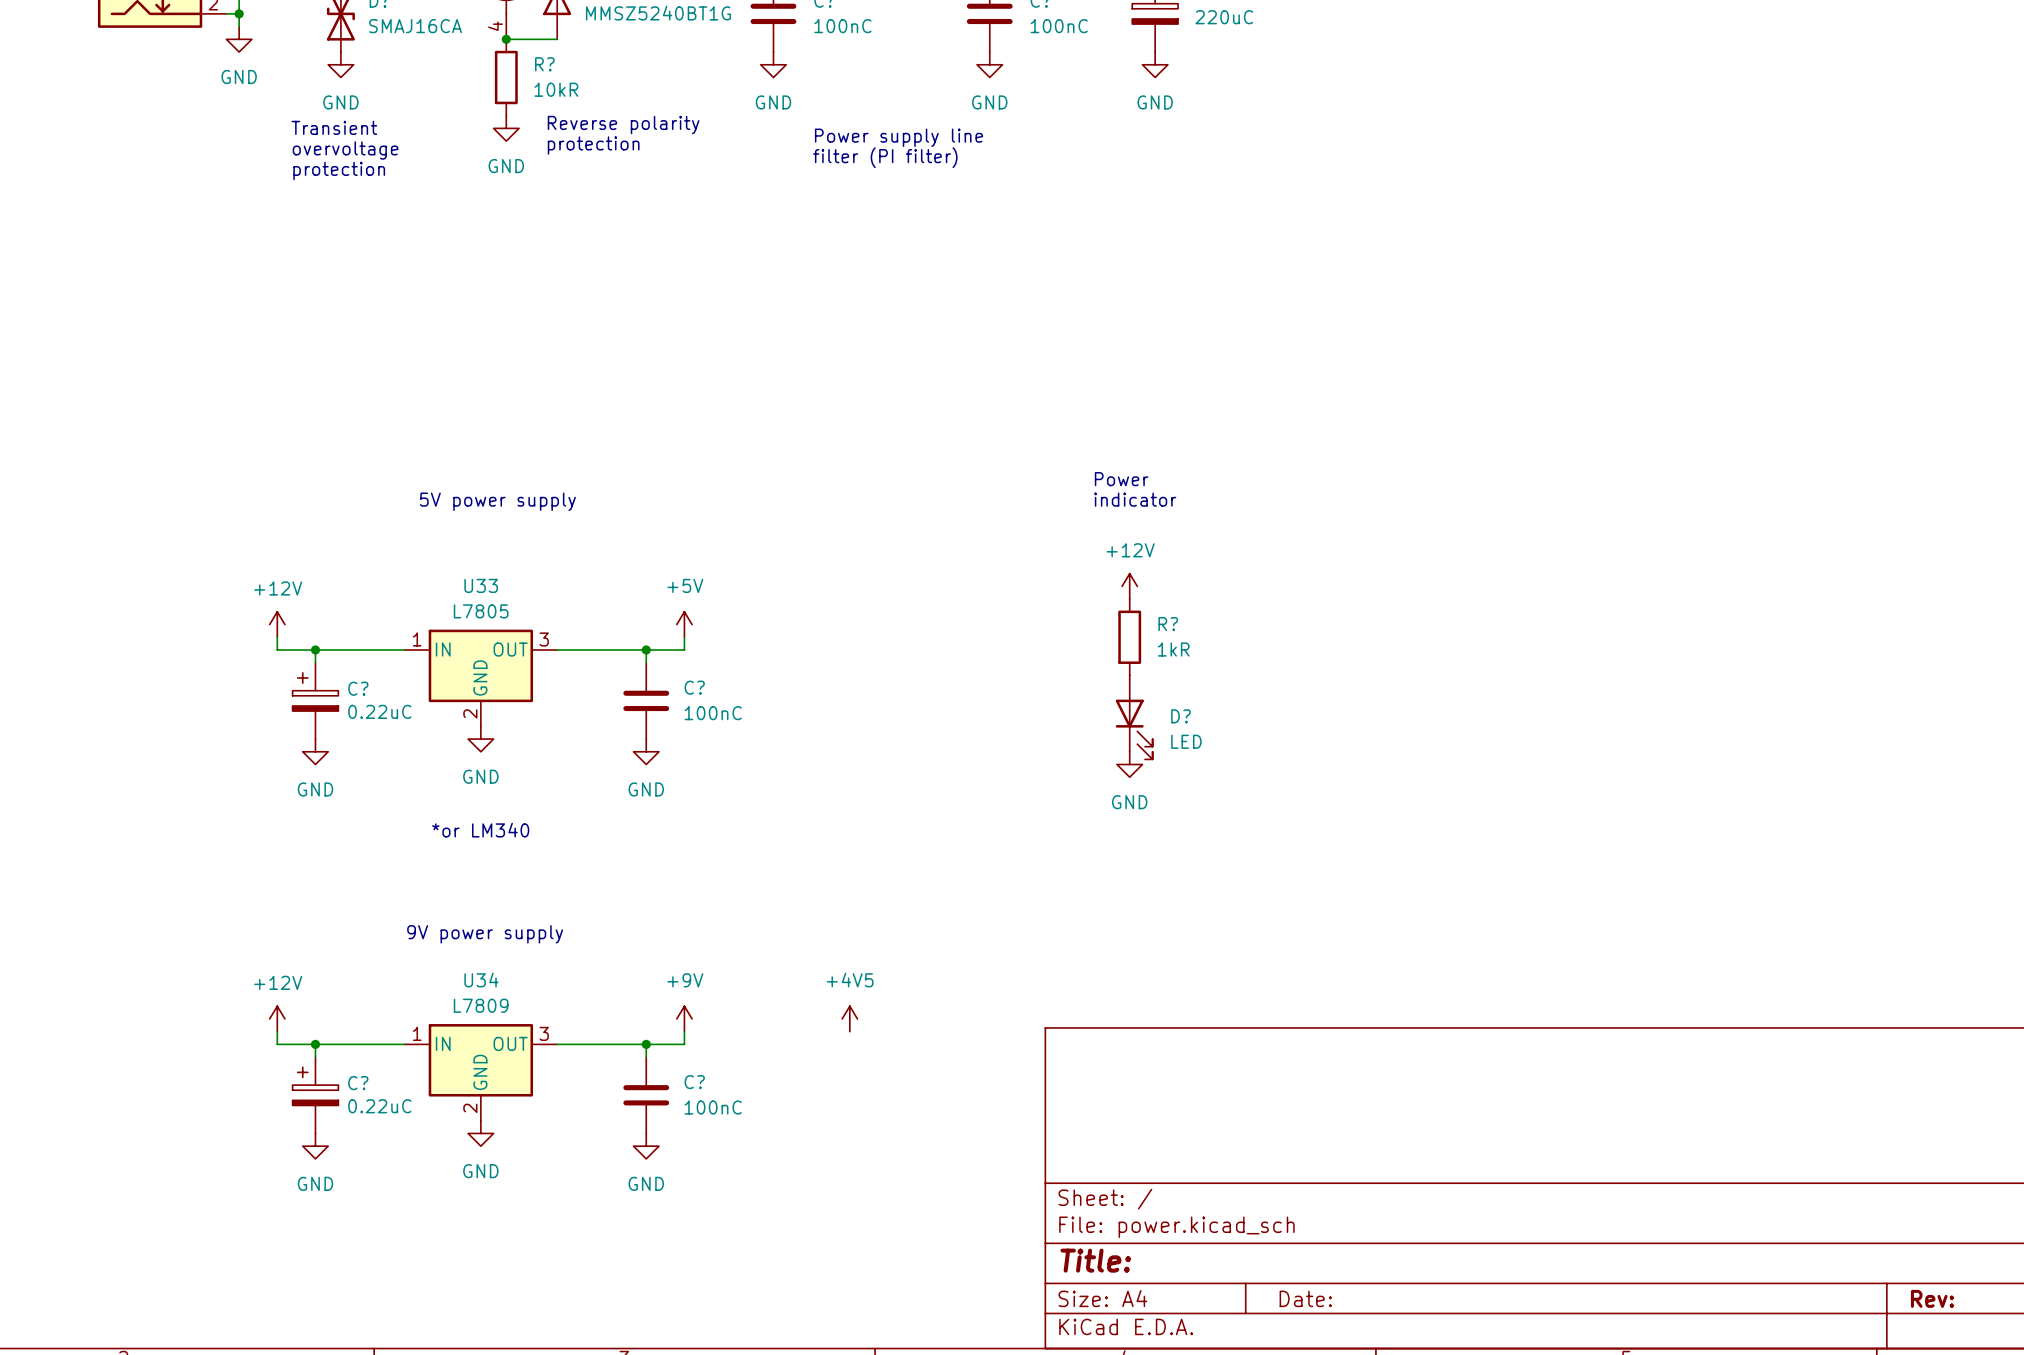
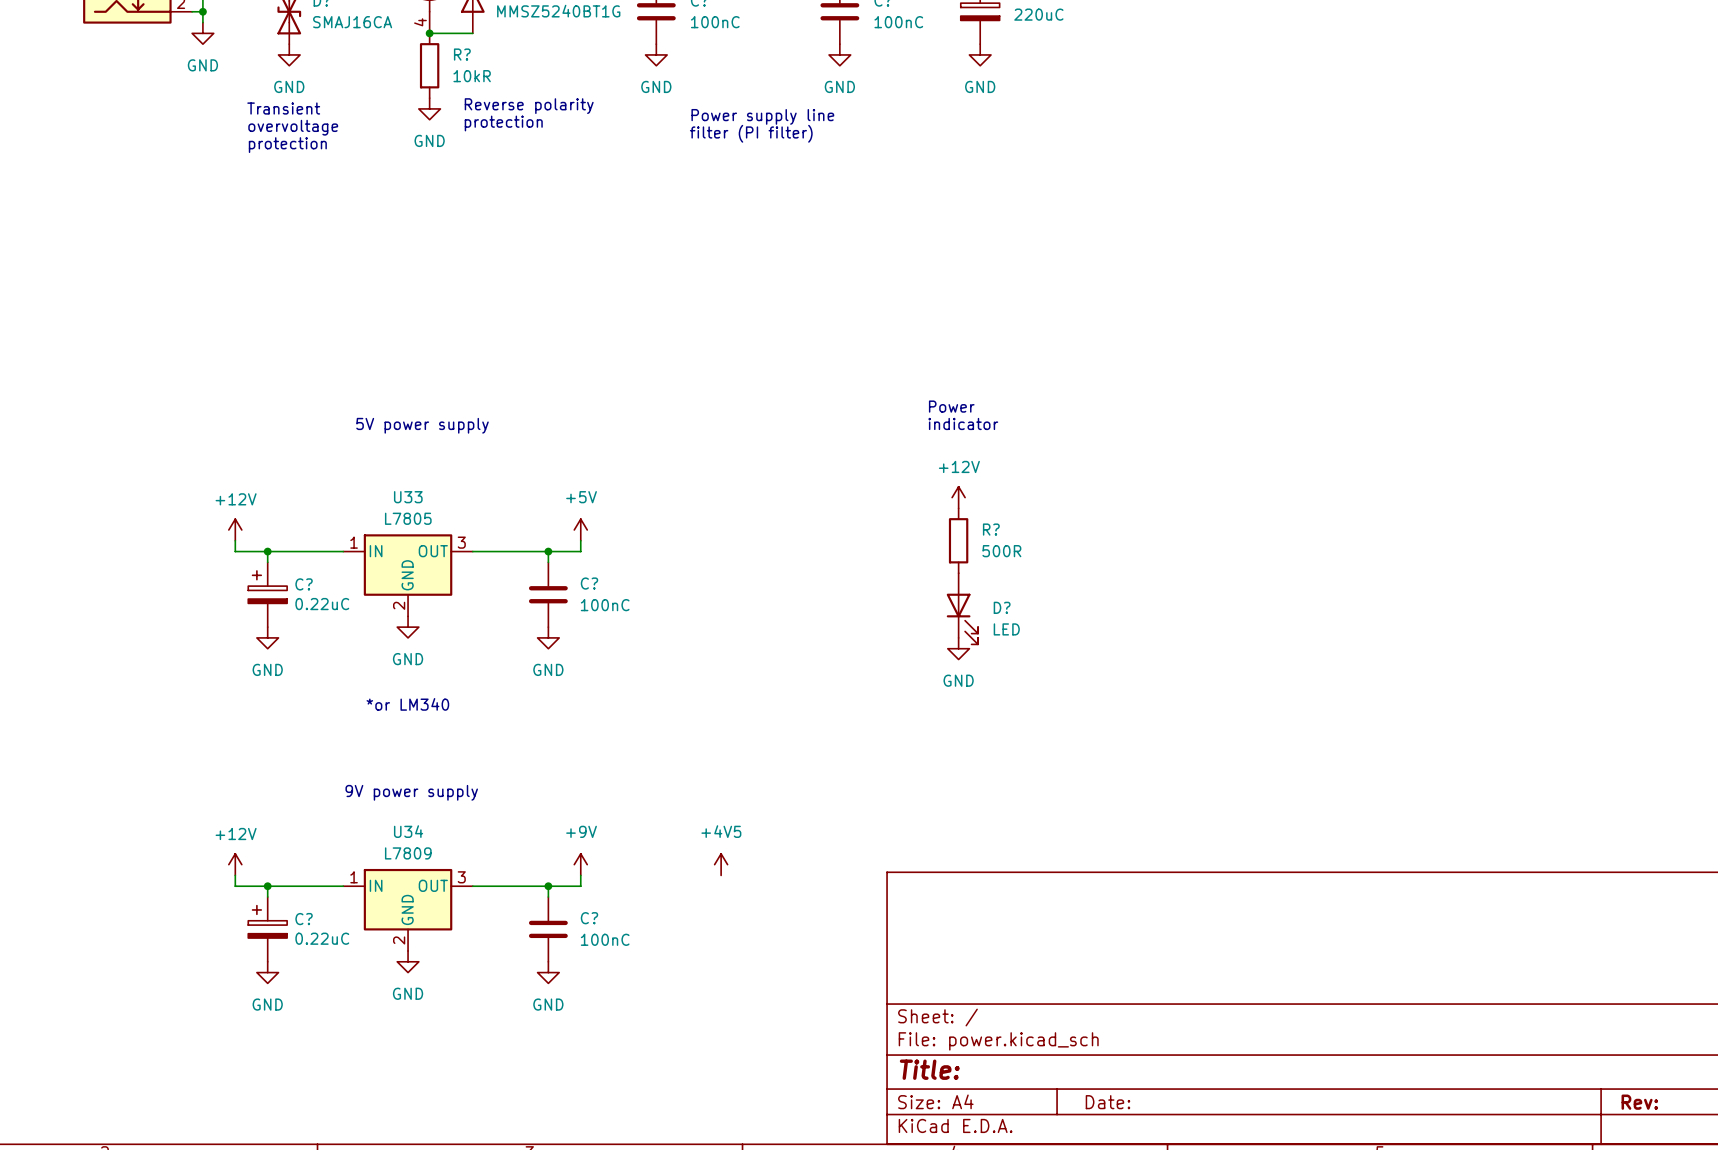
R? value: 1kR (1173, 649) -> 500R (1001, 551)

